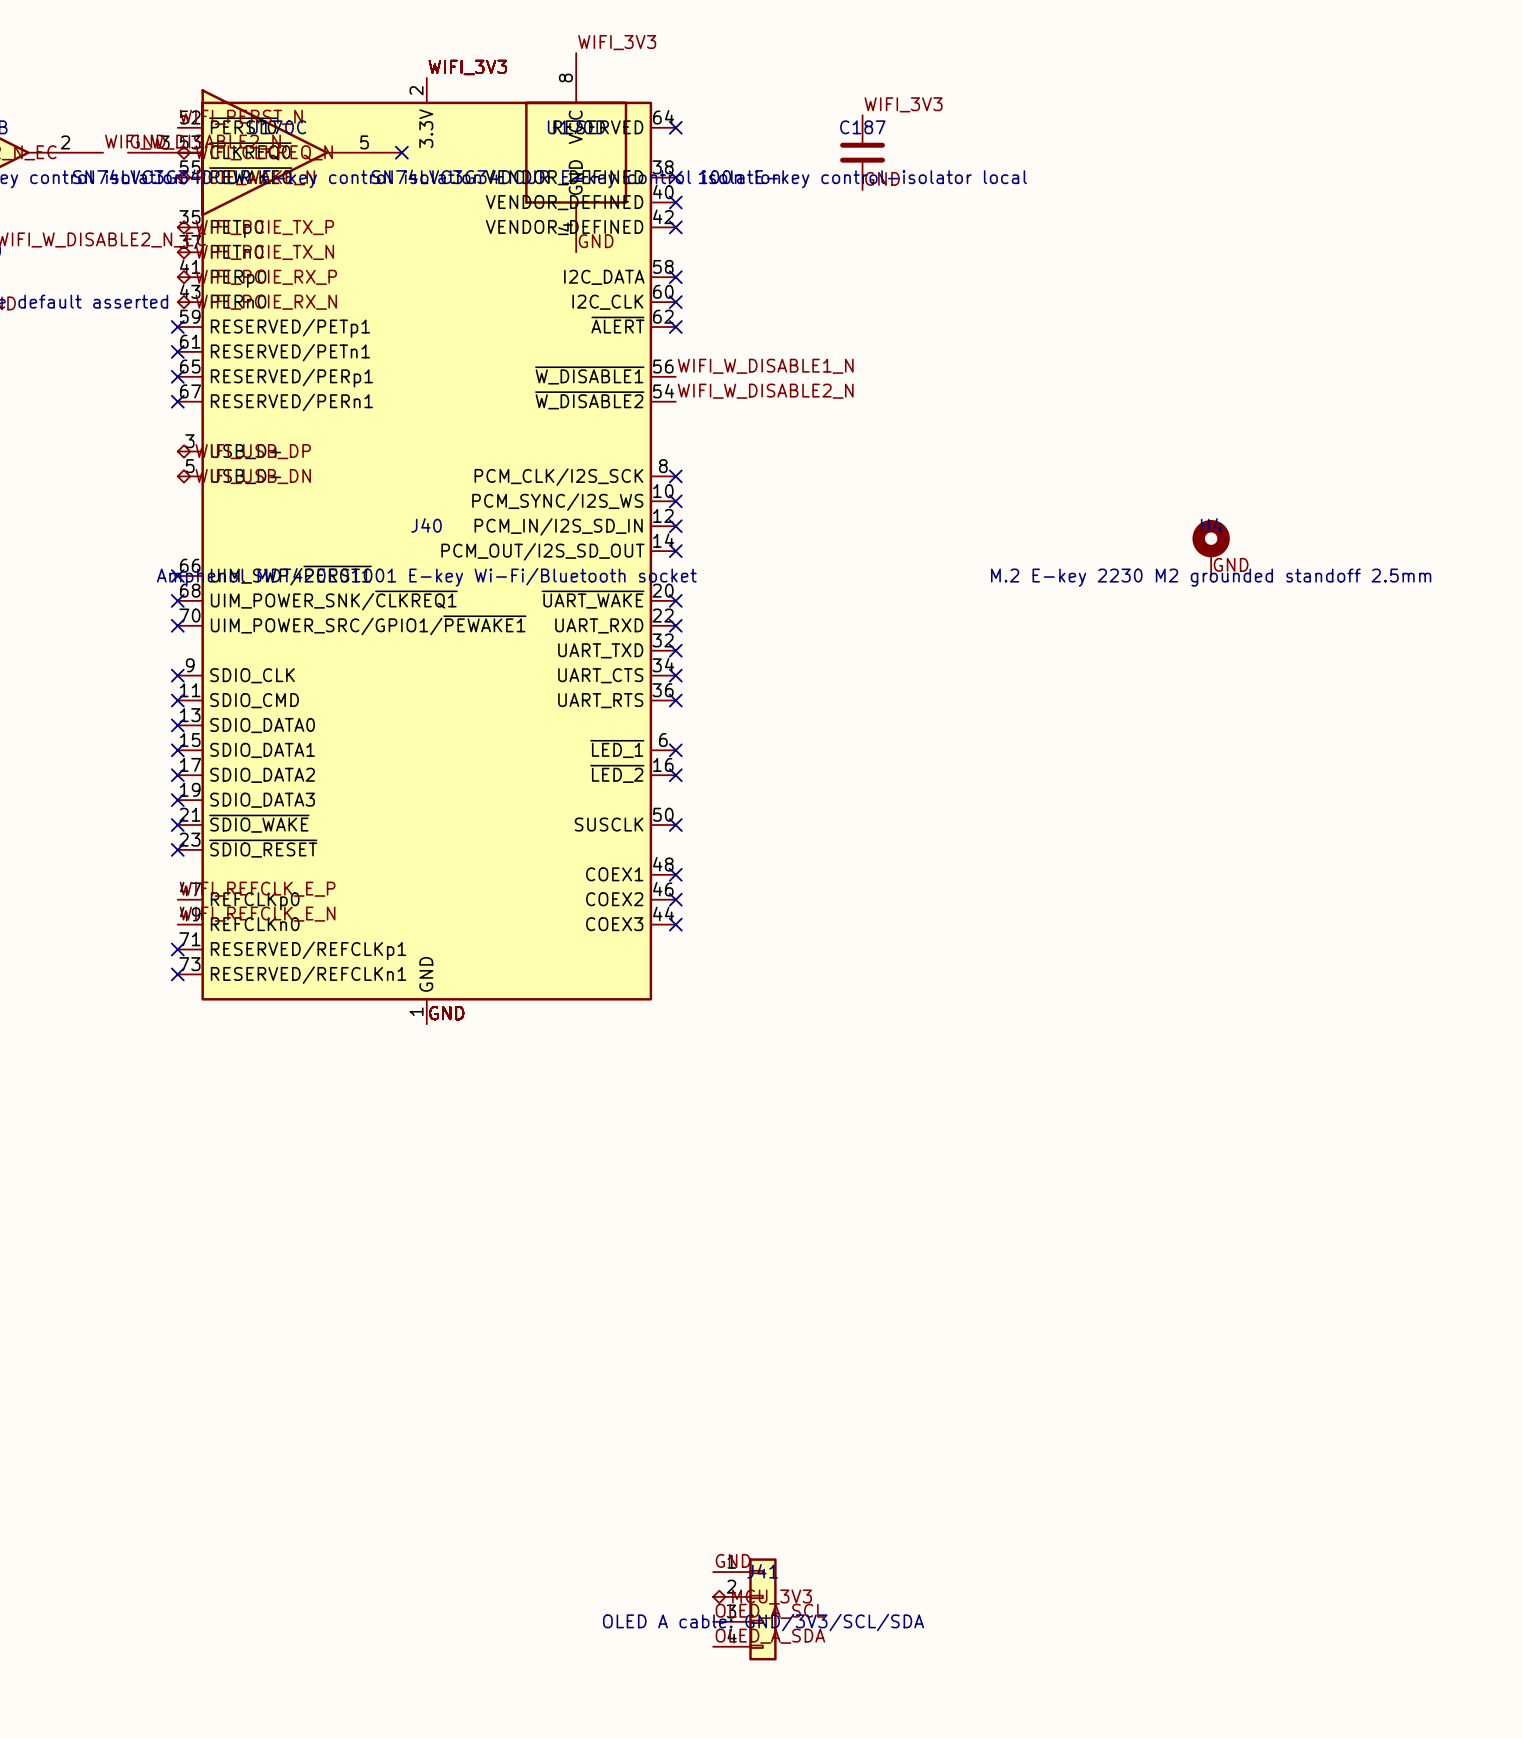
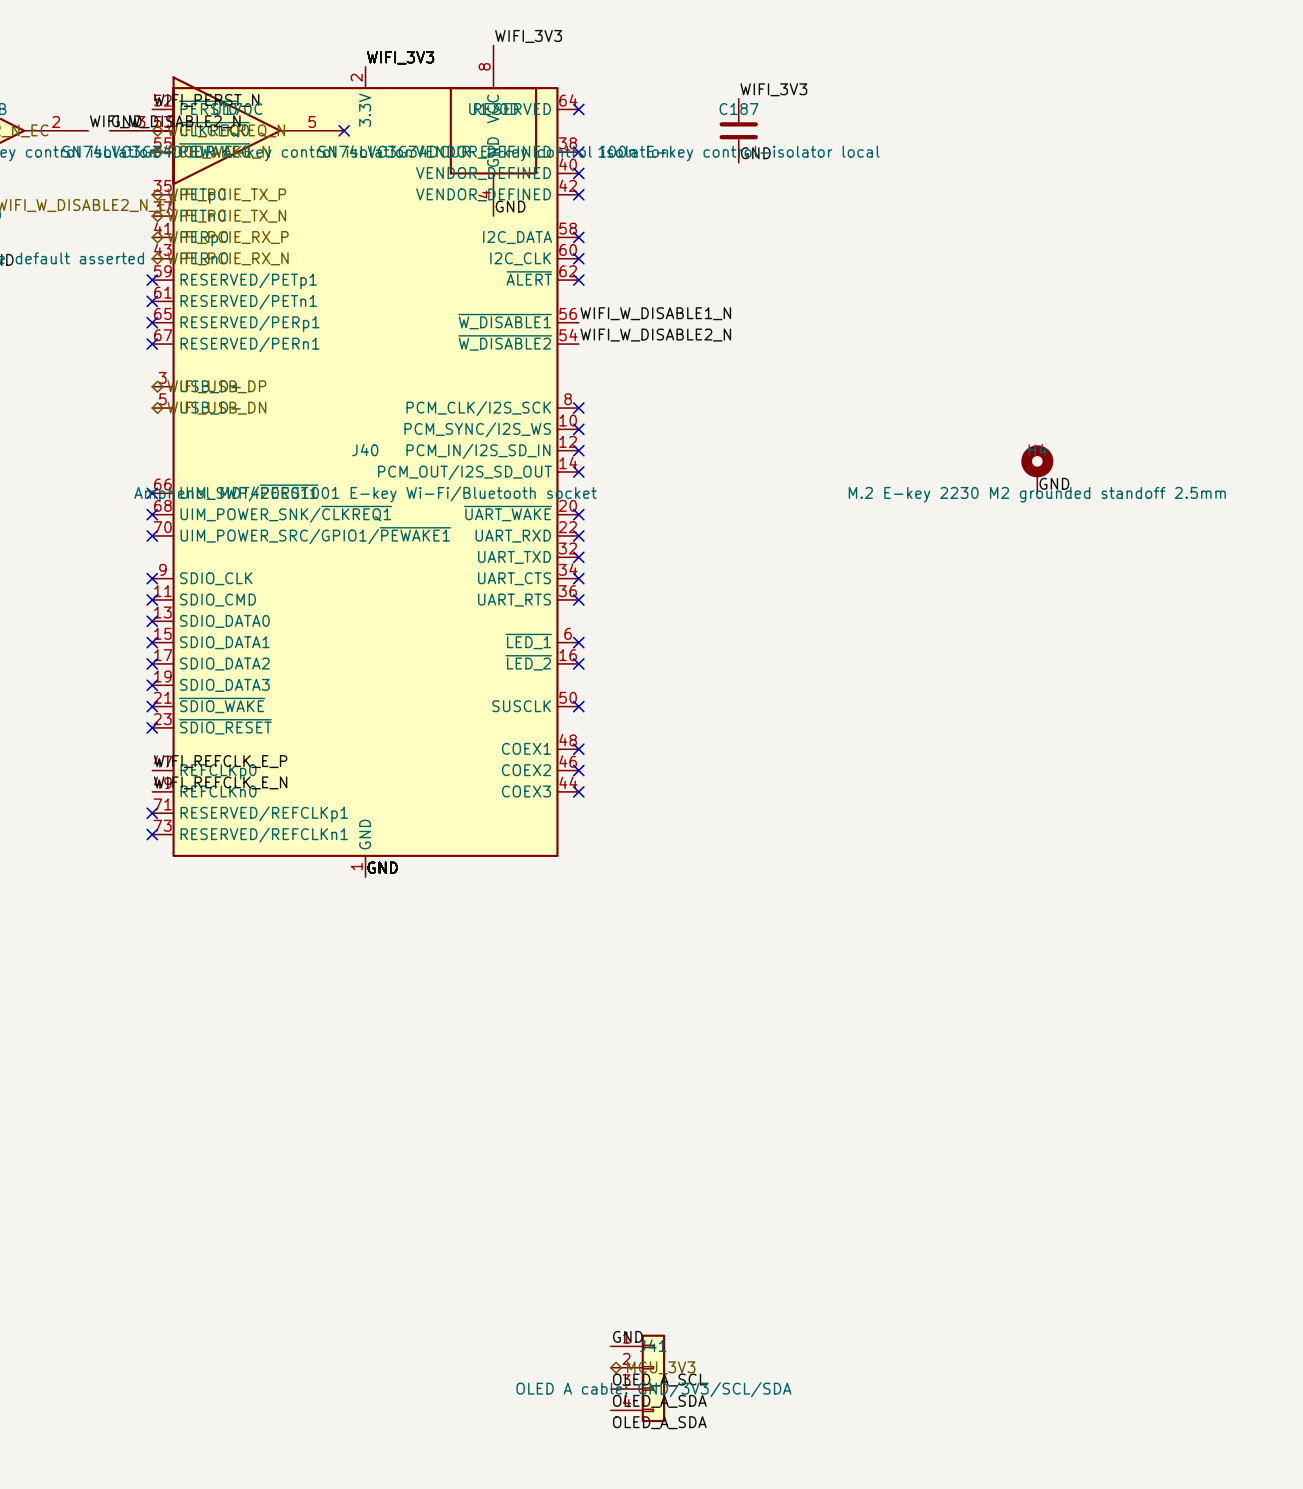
label: none -> OLED_A_SDA (659, 1422)

